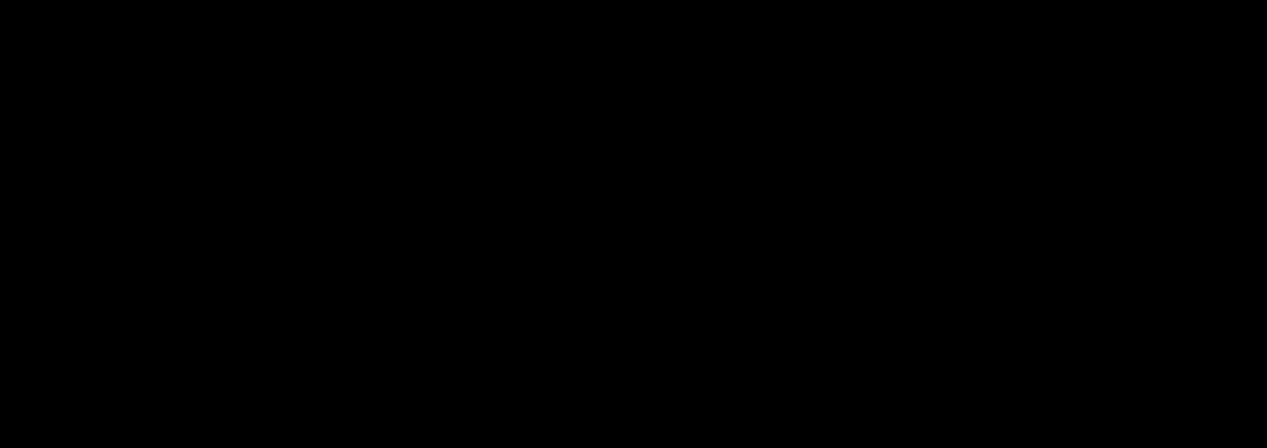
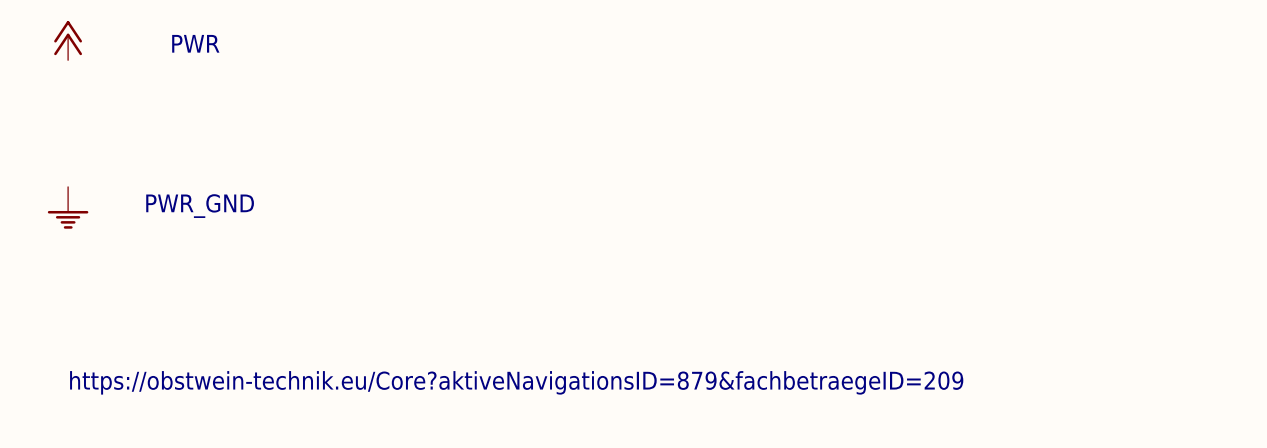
power symbol: none -> PWR (68, 40)
power symbol: none -> PWR_GND (68, 207)
text: none -> https://obstwein-technik.eu/Core?aktiveNavigationsID=879&fachbetraegeID=209 (516, 382)

